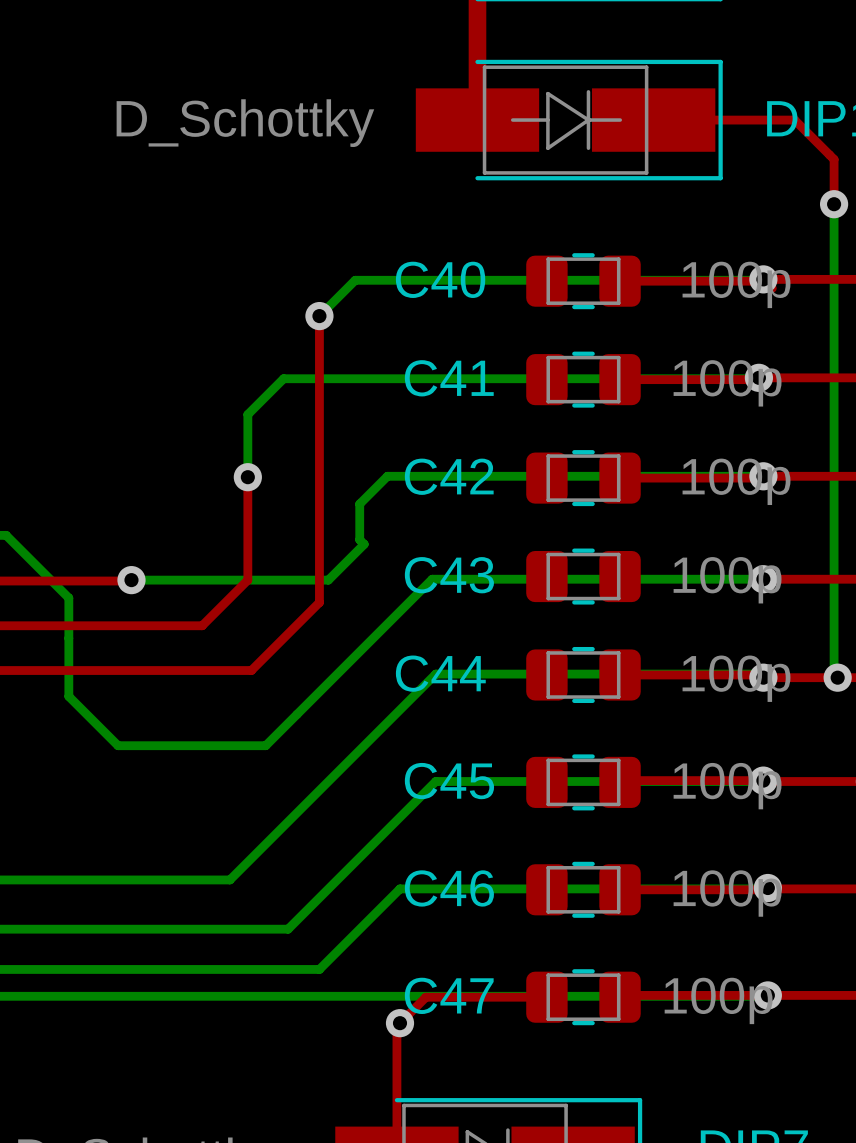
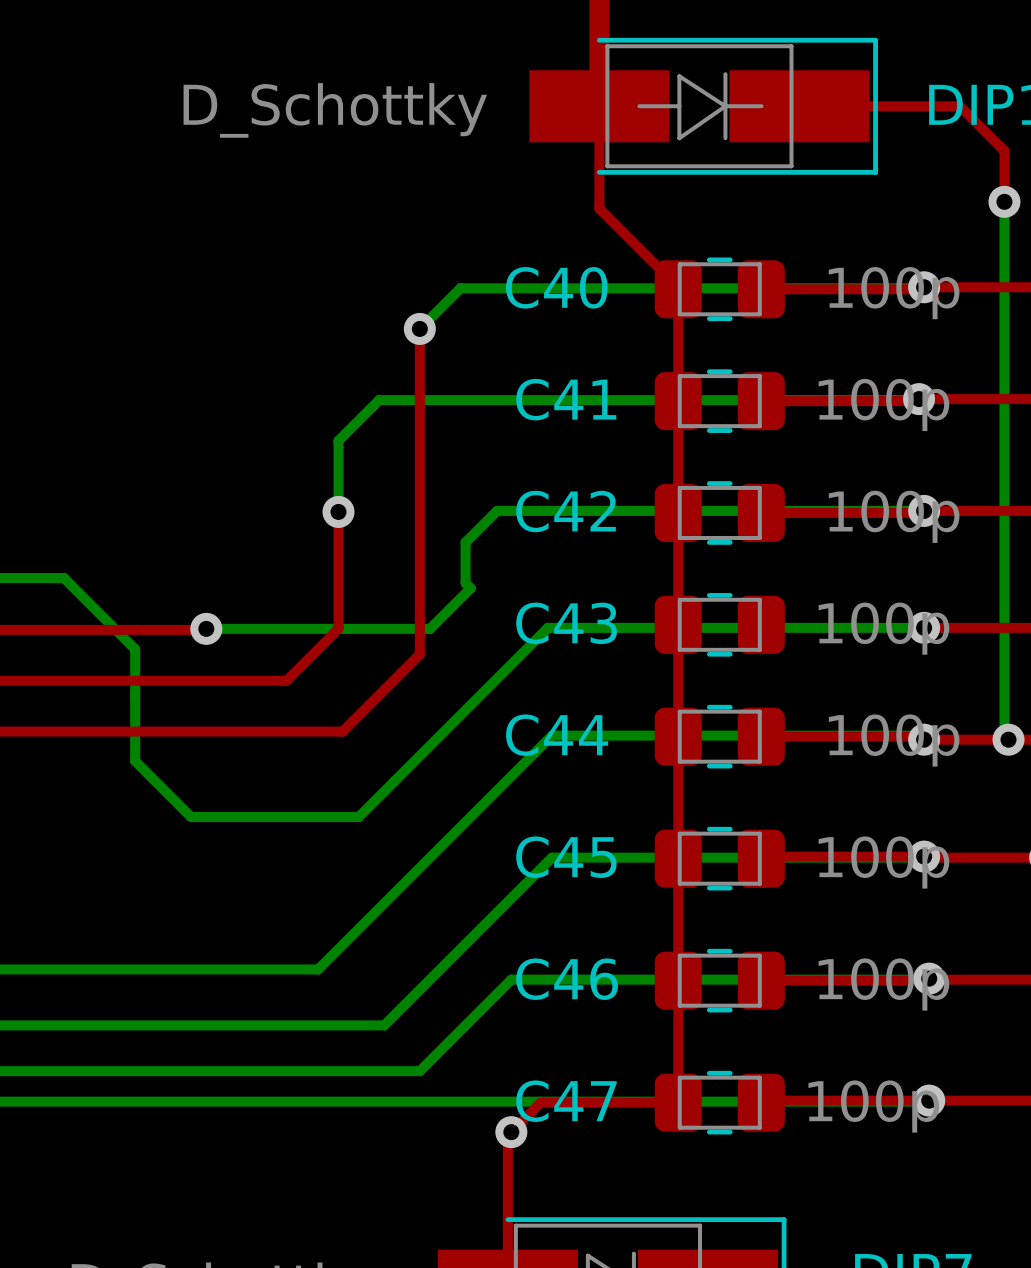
top track: none -> (599, 106) (599, 208) (678, 287) (678, 1102)

